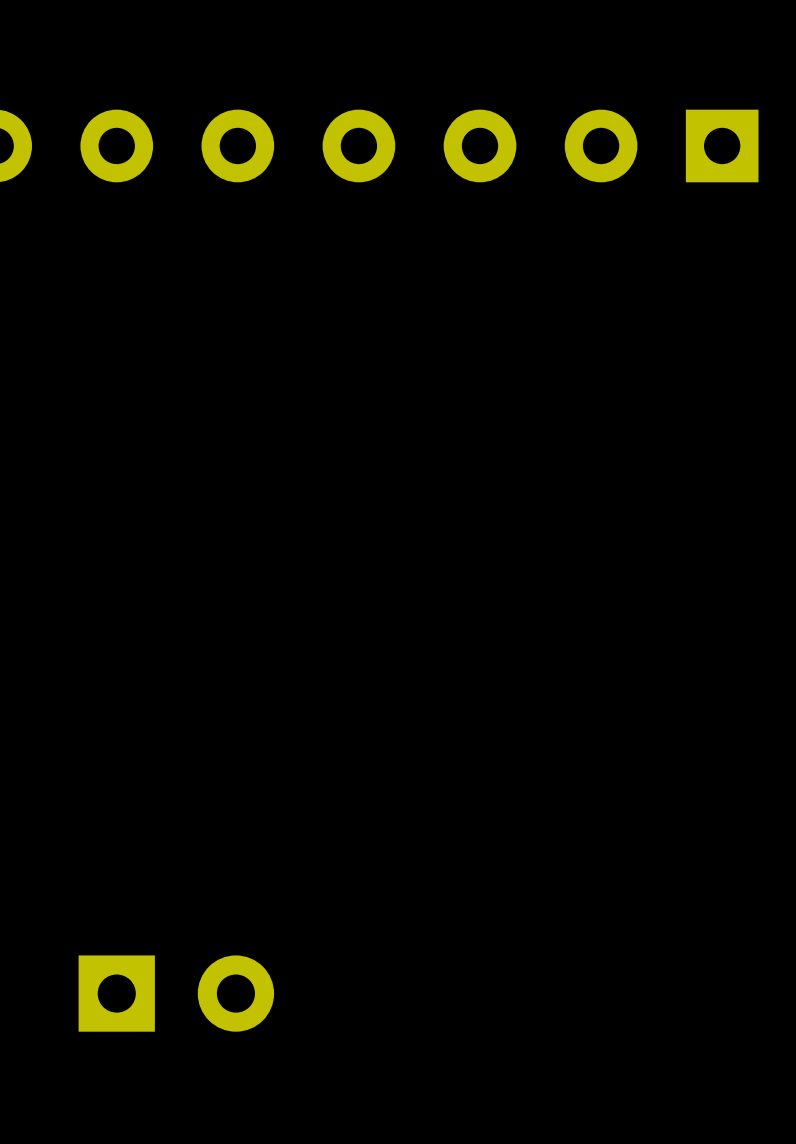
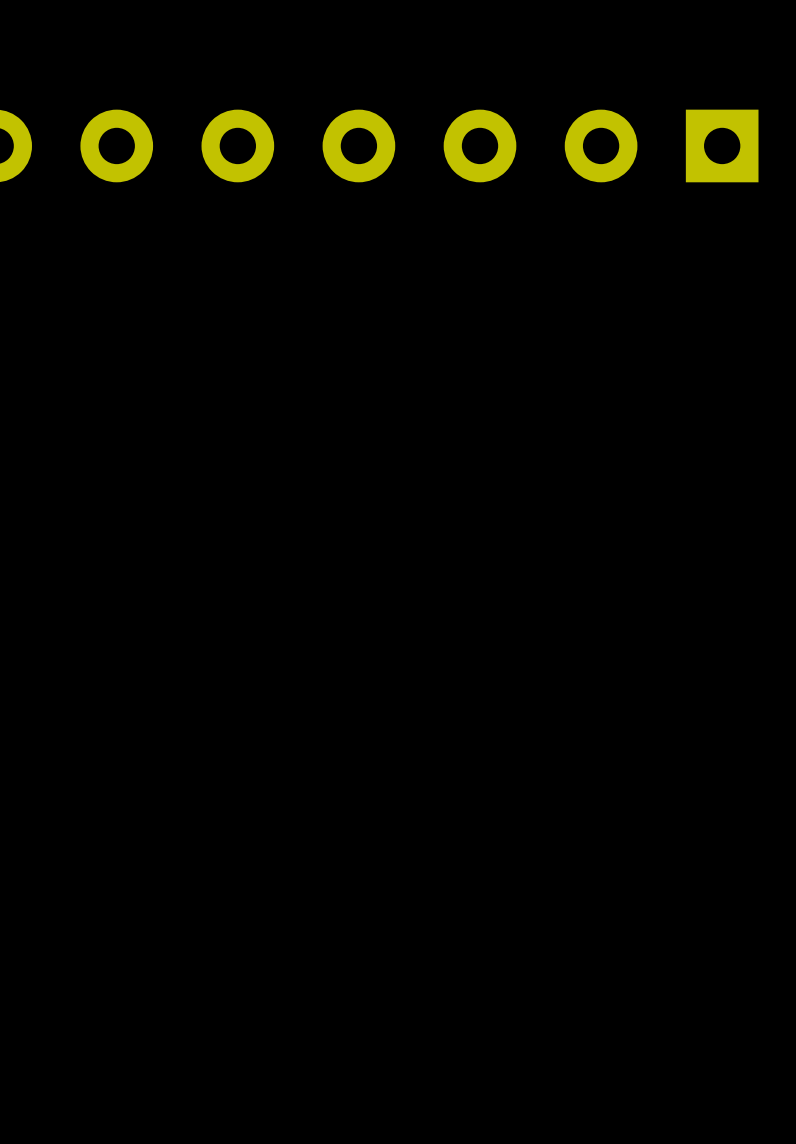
part: (176, 993) -> none

